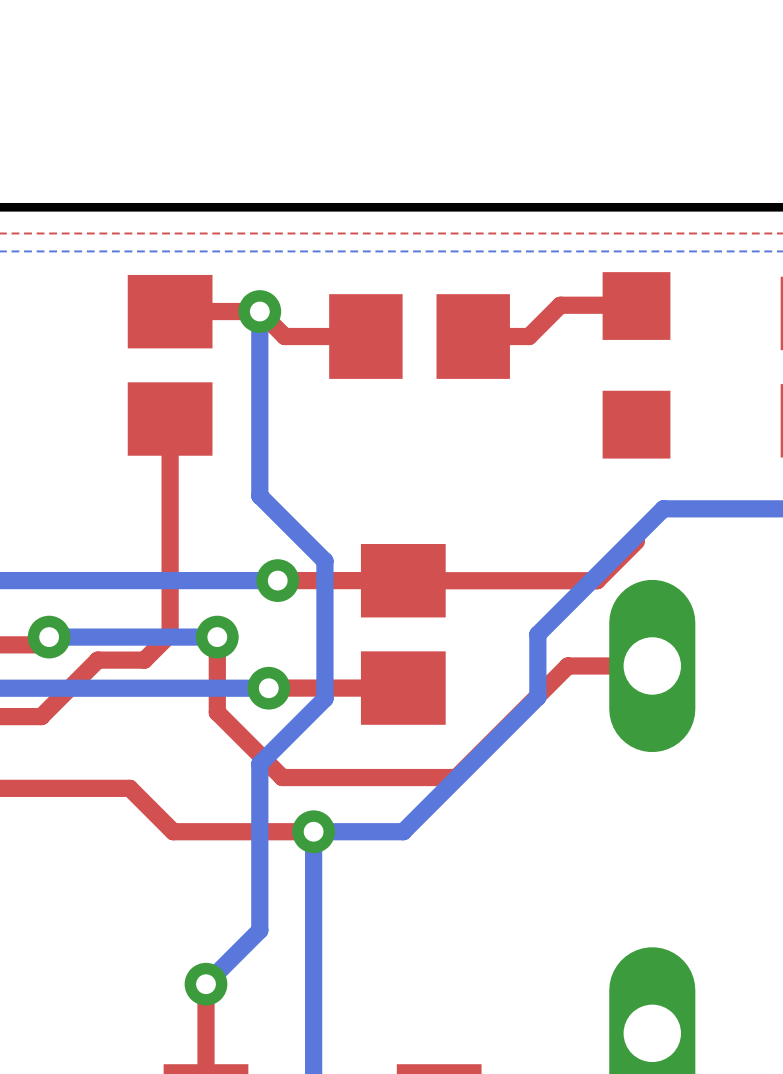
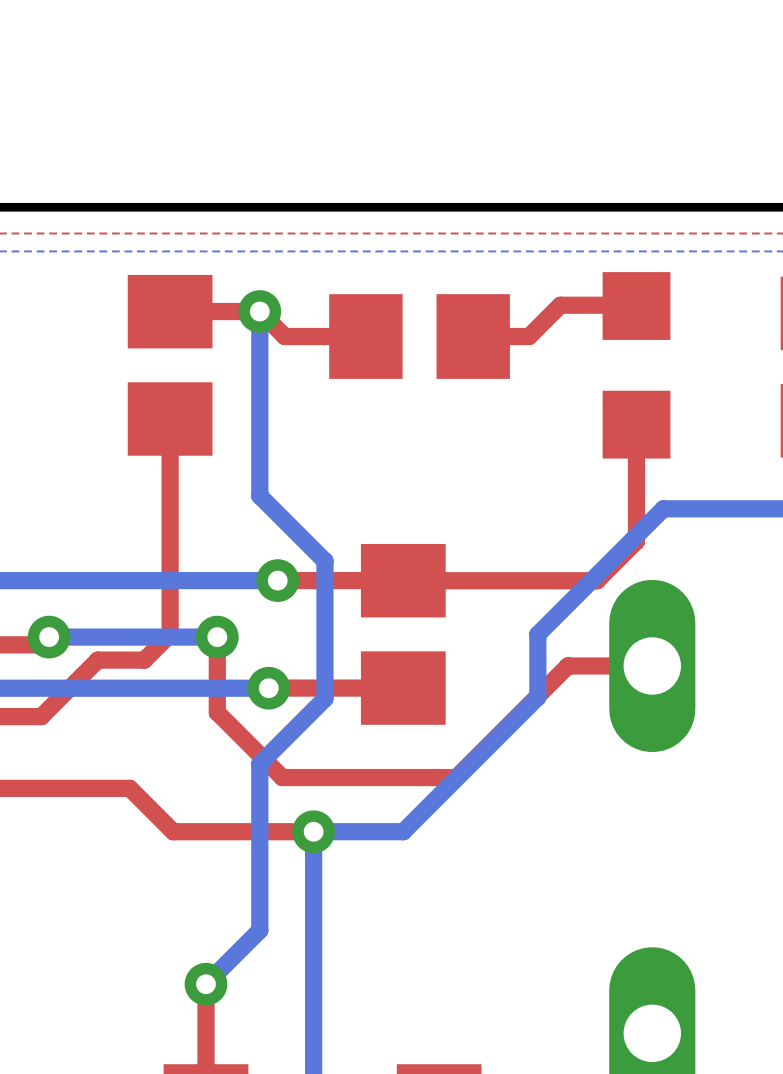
top track: none -> (636, 424) (636, 541)

